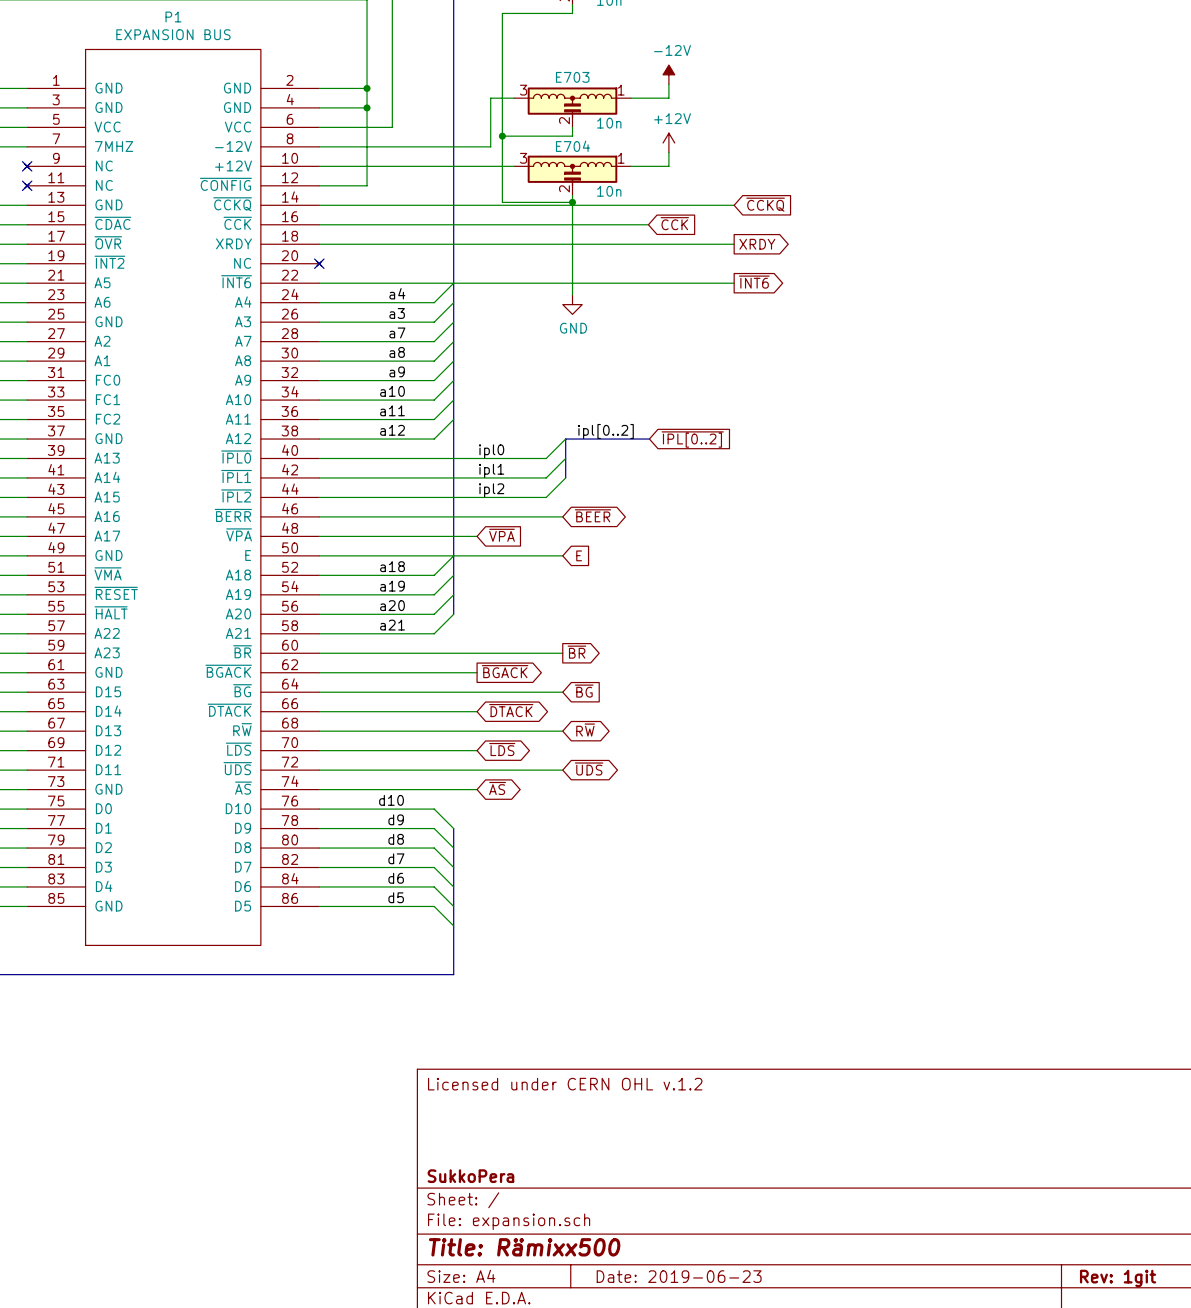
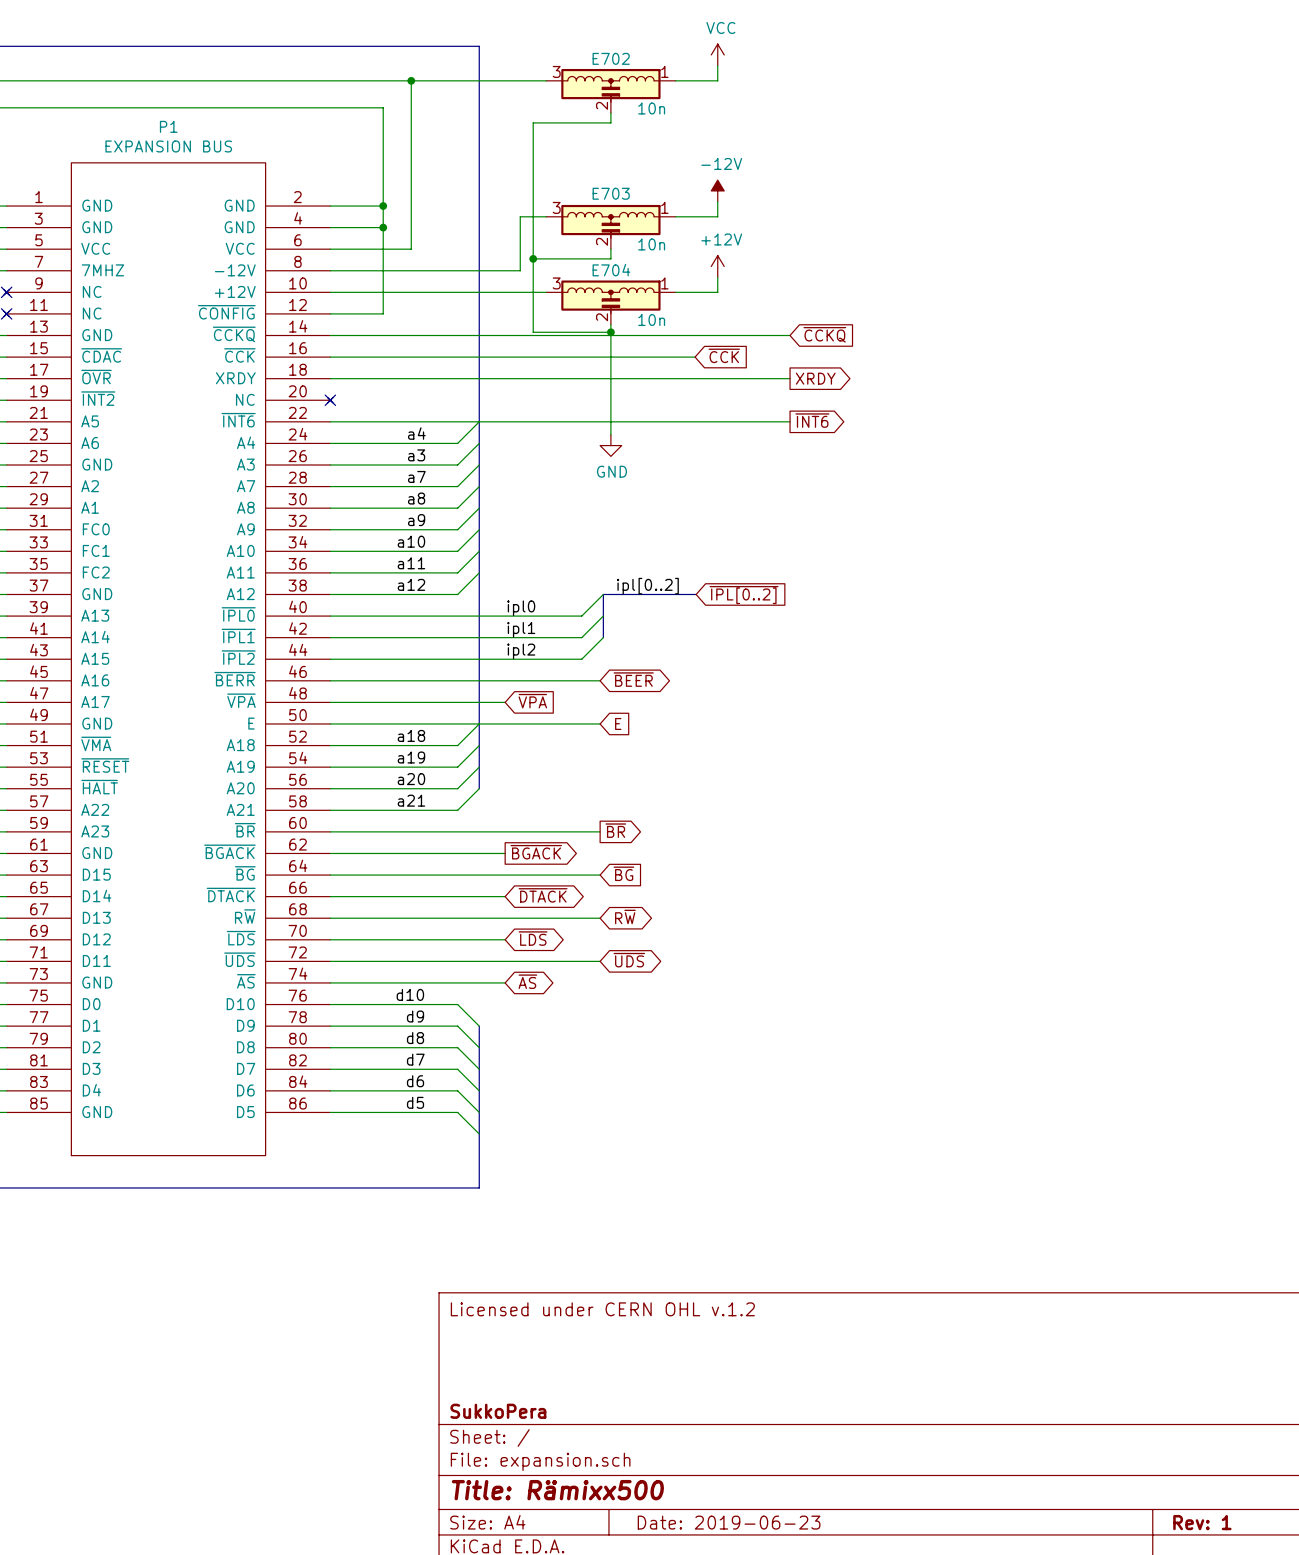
title block: Rev: 1git (1118, 1278) -> Rev: 1 (1202, 1522)

